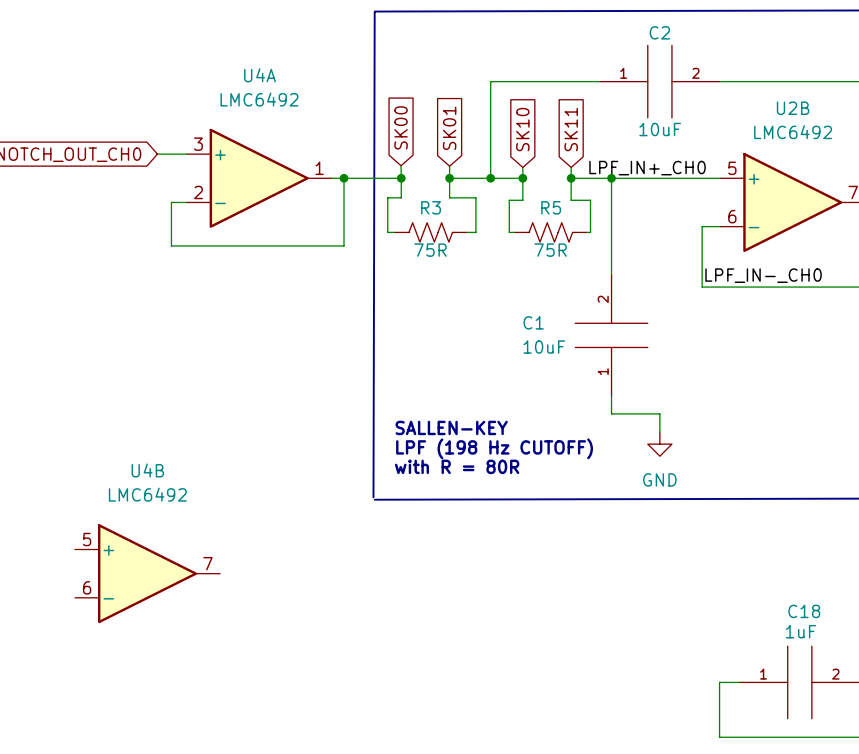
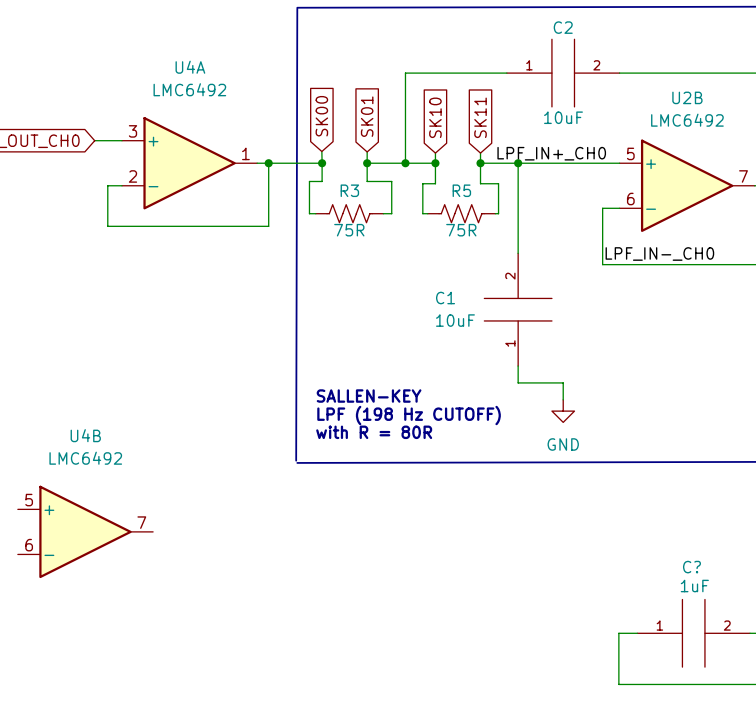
C18 name: C18 (804, 611) -> C? (691, 567)

